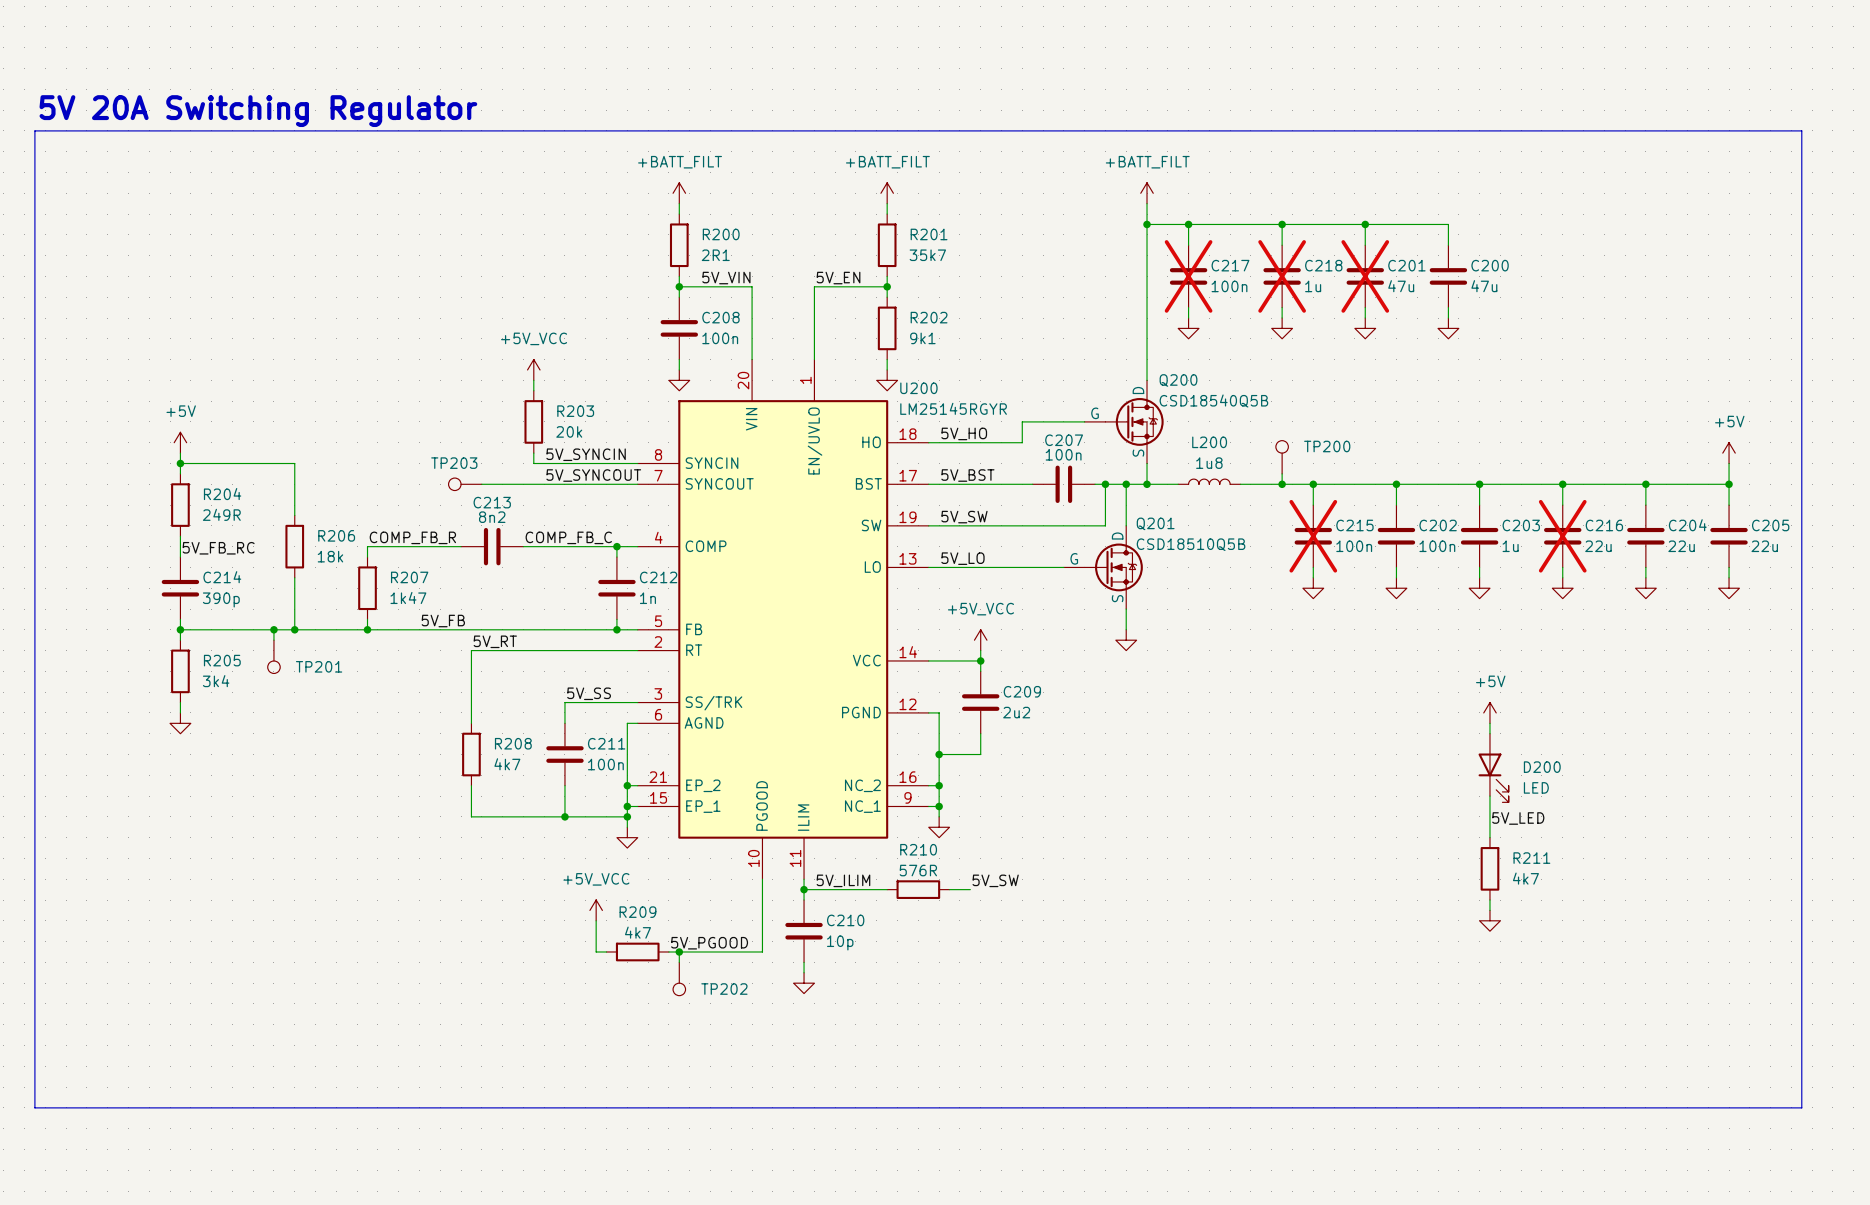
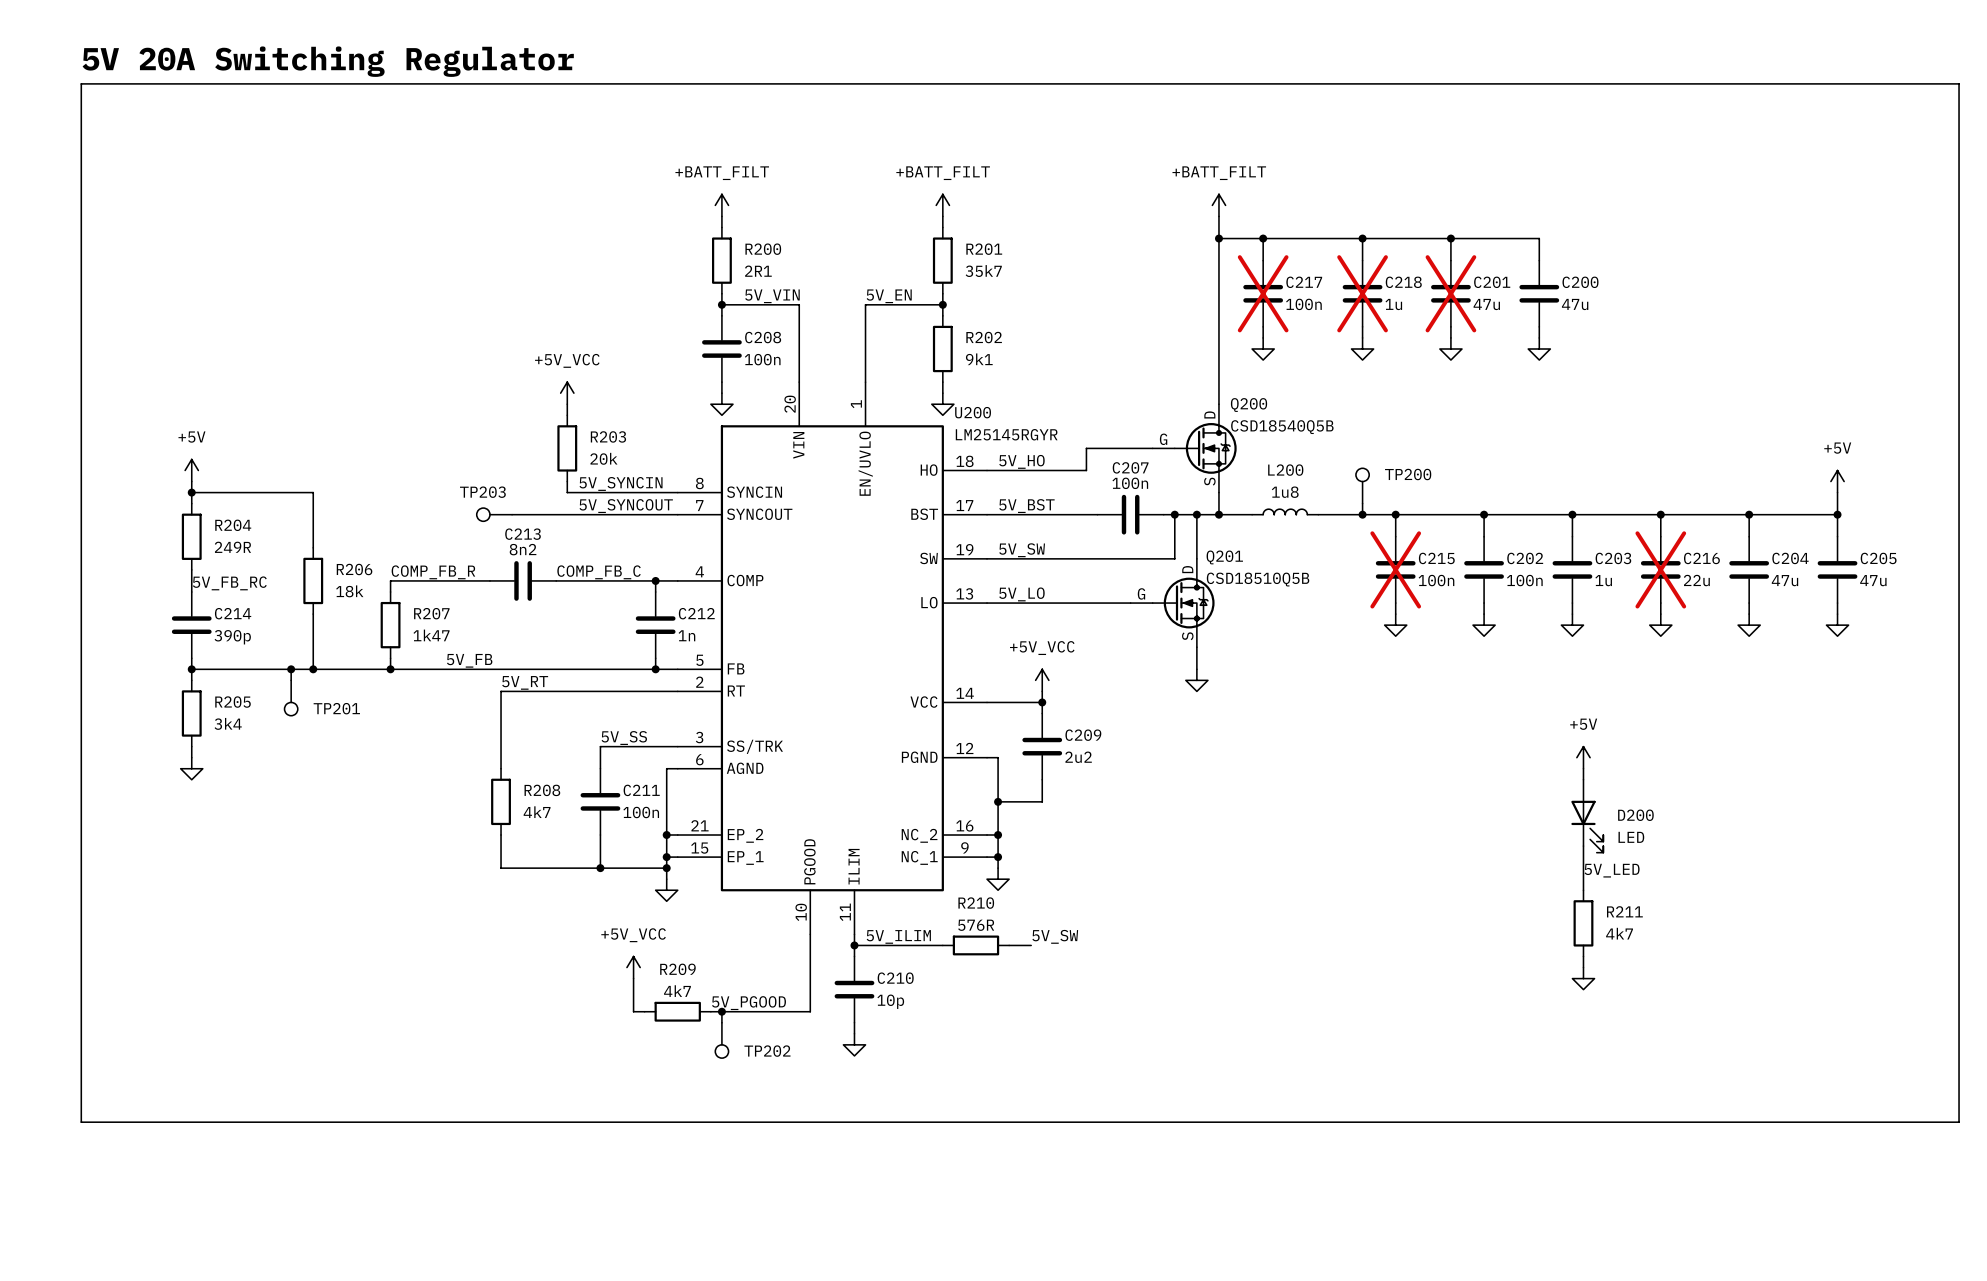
text position: 5V 20A Switching Regulator (258, 111) -> 5V 20A Switching Regulator (328, 61)
line: (34, 130) (1801, 130) (1801, 1107) (34, 1107) (34, 130) -> (81, 83) (81, 1122) (1959, 1122) (1959, 83) (81, 83)
C204 value: 22u (1681, 546) -> 47u (1784, 580)
C205 value: 22u (1764, 546) -> 47u (1873, 580)

